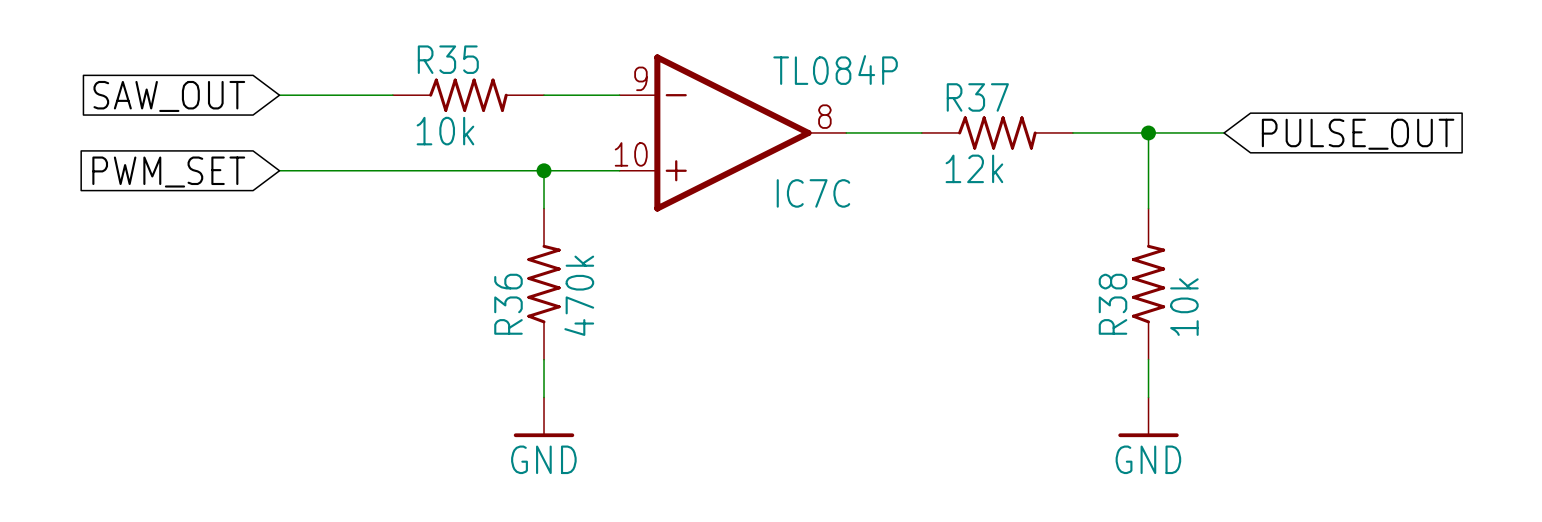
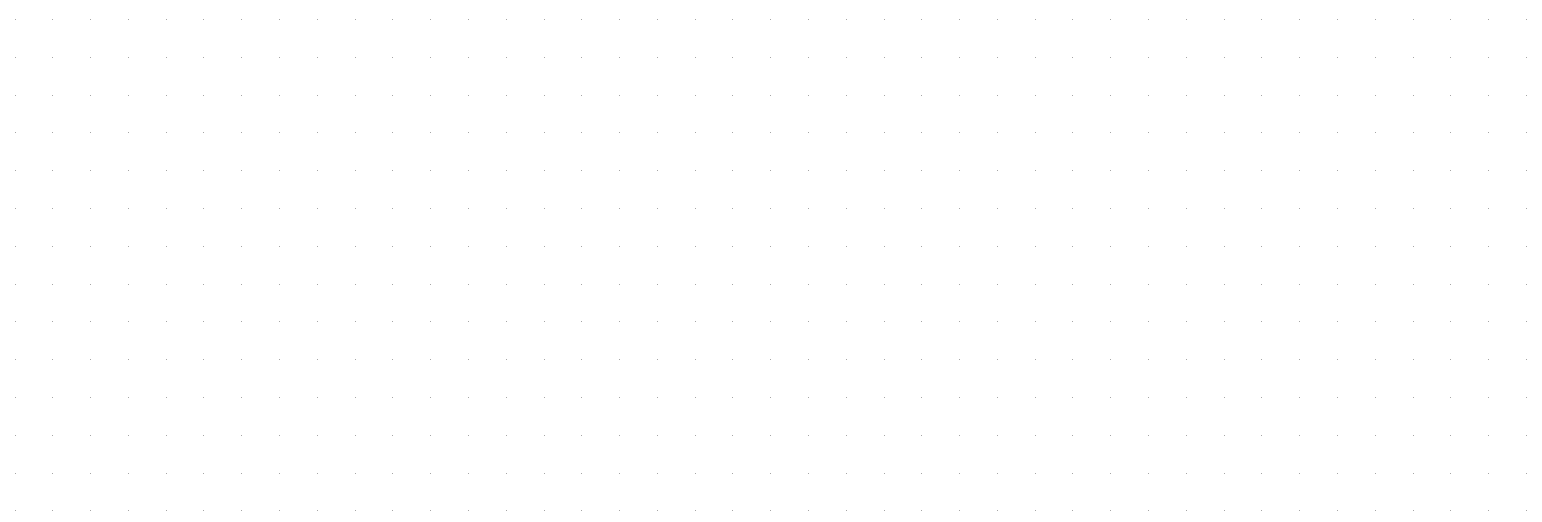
wire: (279, 95) (392, 95) -> none
R35: 10k (468, 95) -> none
wire: (544, 95) (619, 95) -> none
global label: SAW_OUT (169, 96) -> none
IC7C: TL084P (732, 132) -> none
wire: (846, 132) (921, 132) -> none
R37: 12k (997, 132) -> none
wire: (1072, 132) (1224, 132) -> none
wire: (1148, 132) (1148, 208) -> none
junction: (1148, 132) -> none
global label: PULSE_OUT (1358, 134) -> none
wire: (279, 170) (619, 170) -> none
wire: (544, 170) (544, 208) -> none
junction: (544, 170) -> none
global label: PWM_SET (168, 172) -> none
R36: 470k (544, 284) -> none
R38: 10k (1148, 284) -> none
wire: (544, 359) (544, 397) -> none
wire: (1148, 359) (1148, 397) -> none
power symbol: GND (544, 417) -> none
power symbol: GND (1148, 417) -> none

